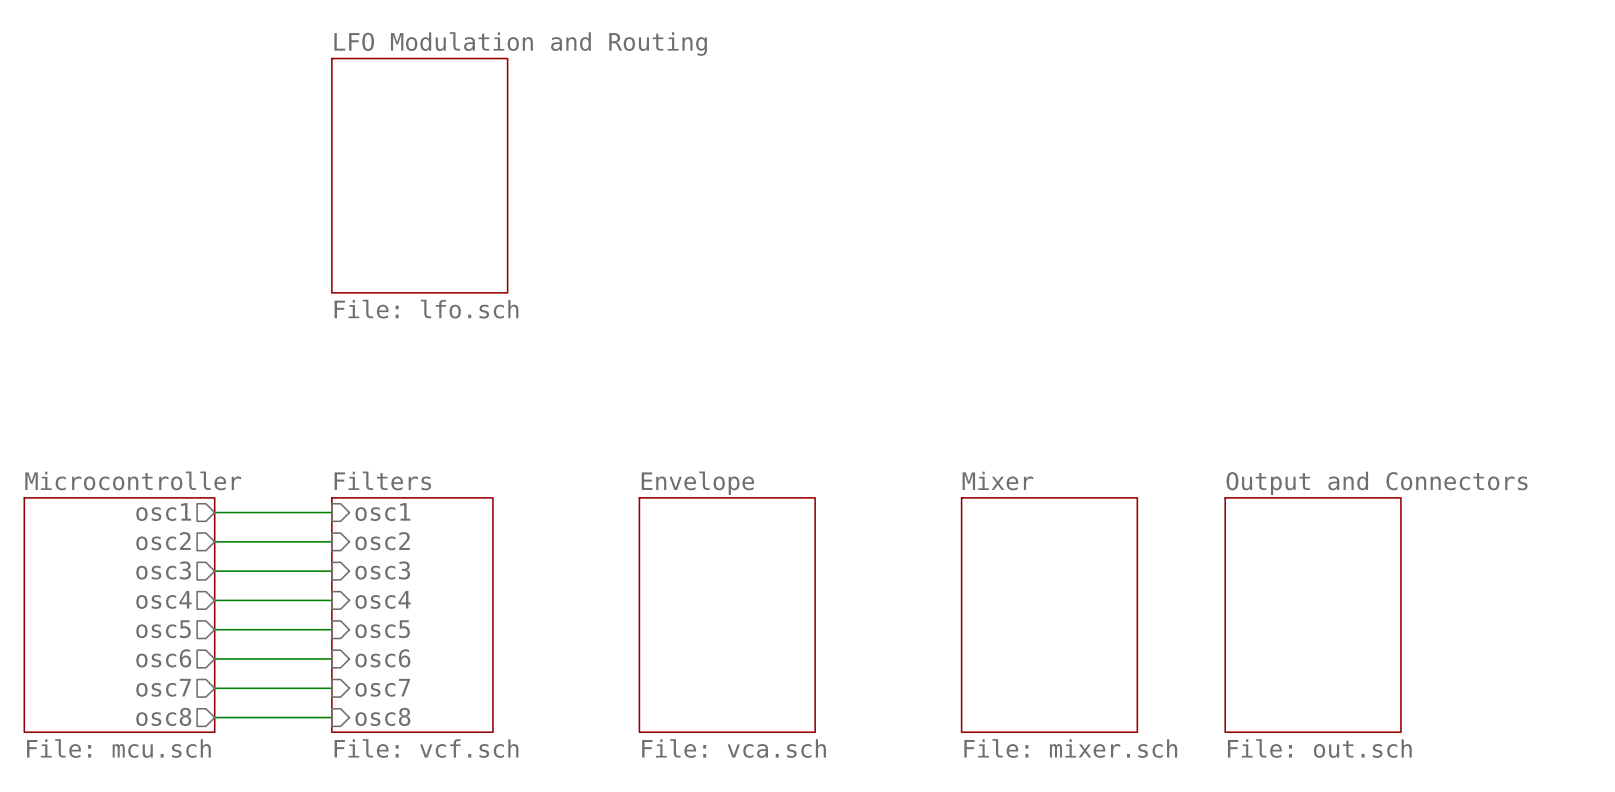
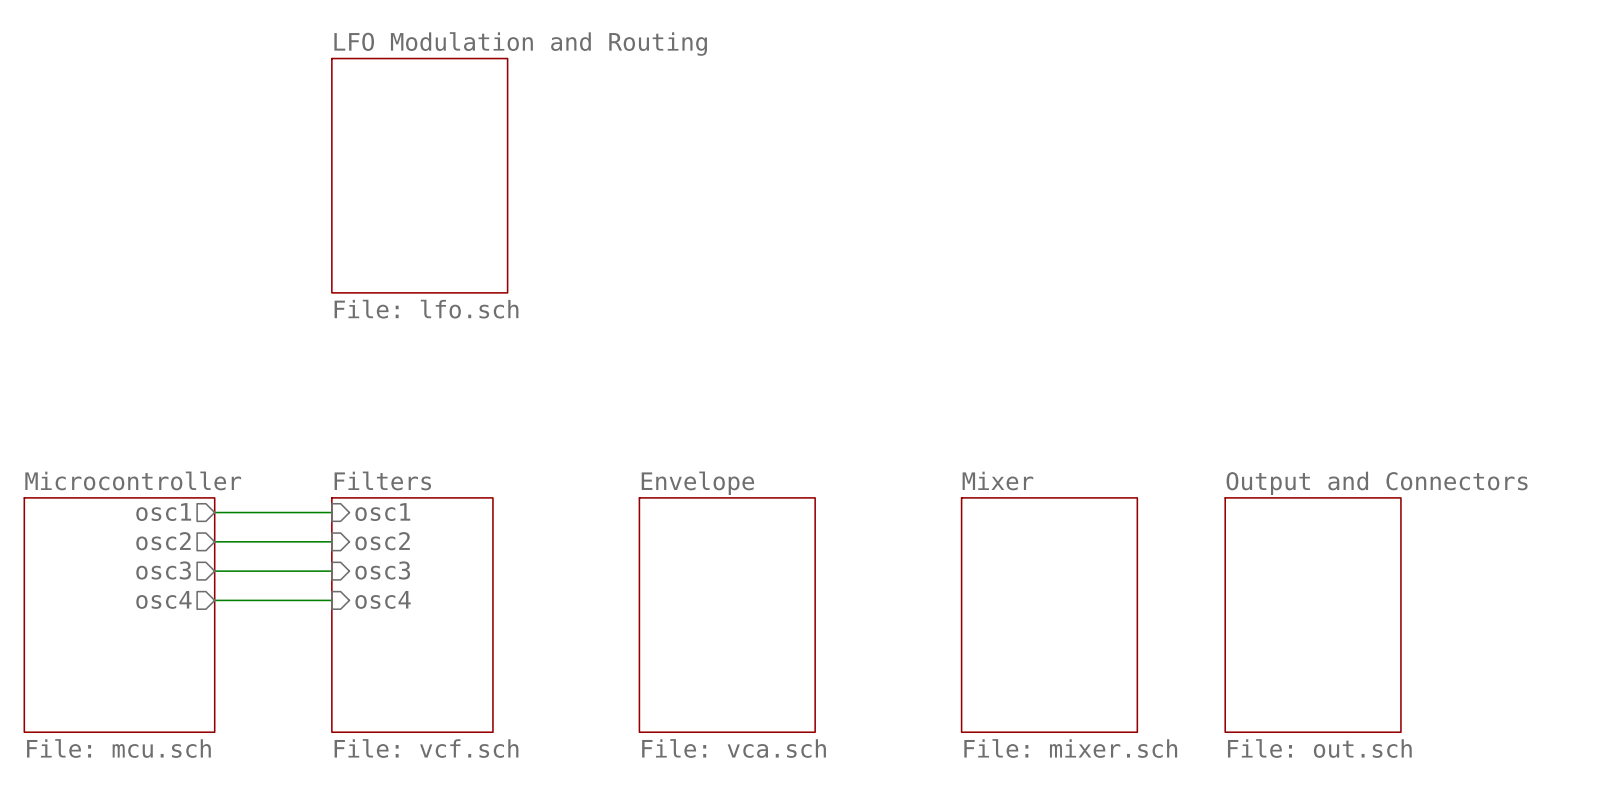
sheet pin: osc5 (163, 629) -> none
wire: (214, 629) (331, 629) -> none
sheet pin: osc5 (382, 629) -> none
sheet pin: osc6 (163, 658) -> none
wire: (214, 658) (331, 658) -> none
sheet pin: osc6 (382, 658) -> none
sheet pin: osc7 (163, 687) -> none
sheet pin: osc7 (382, 687) -> none
wire: (214, 688) (331, 688) -> none
sheet pin: osc8 (163, 716) -> none
sheet pin: osc8 (382, 716) -> none
wire: (214, 717) (331, 717) -> none

